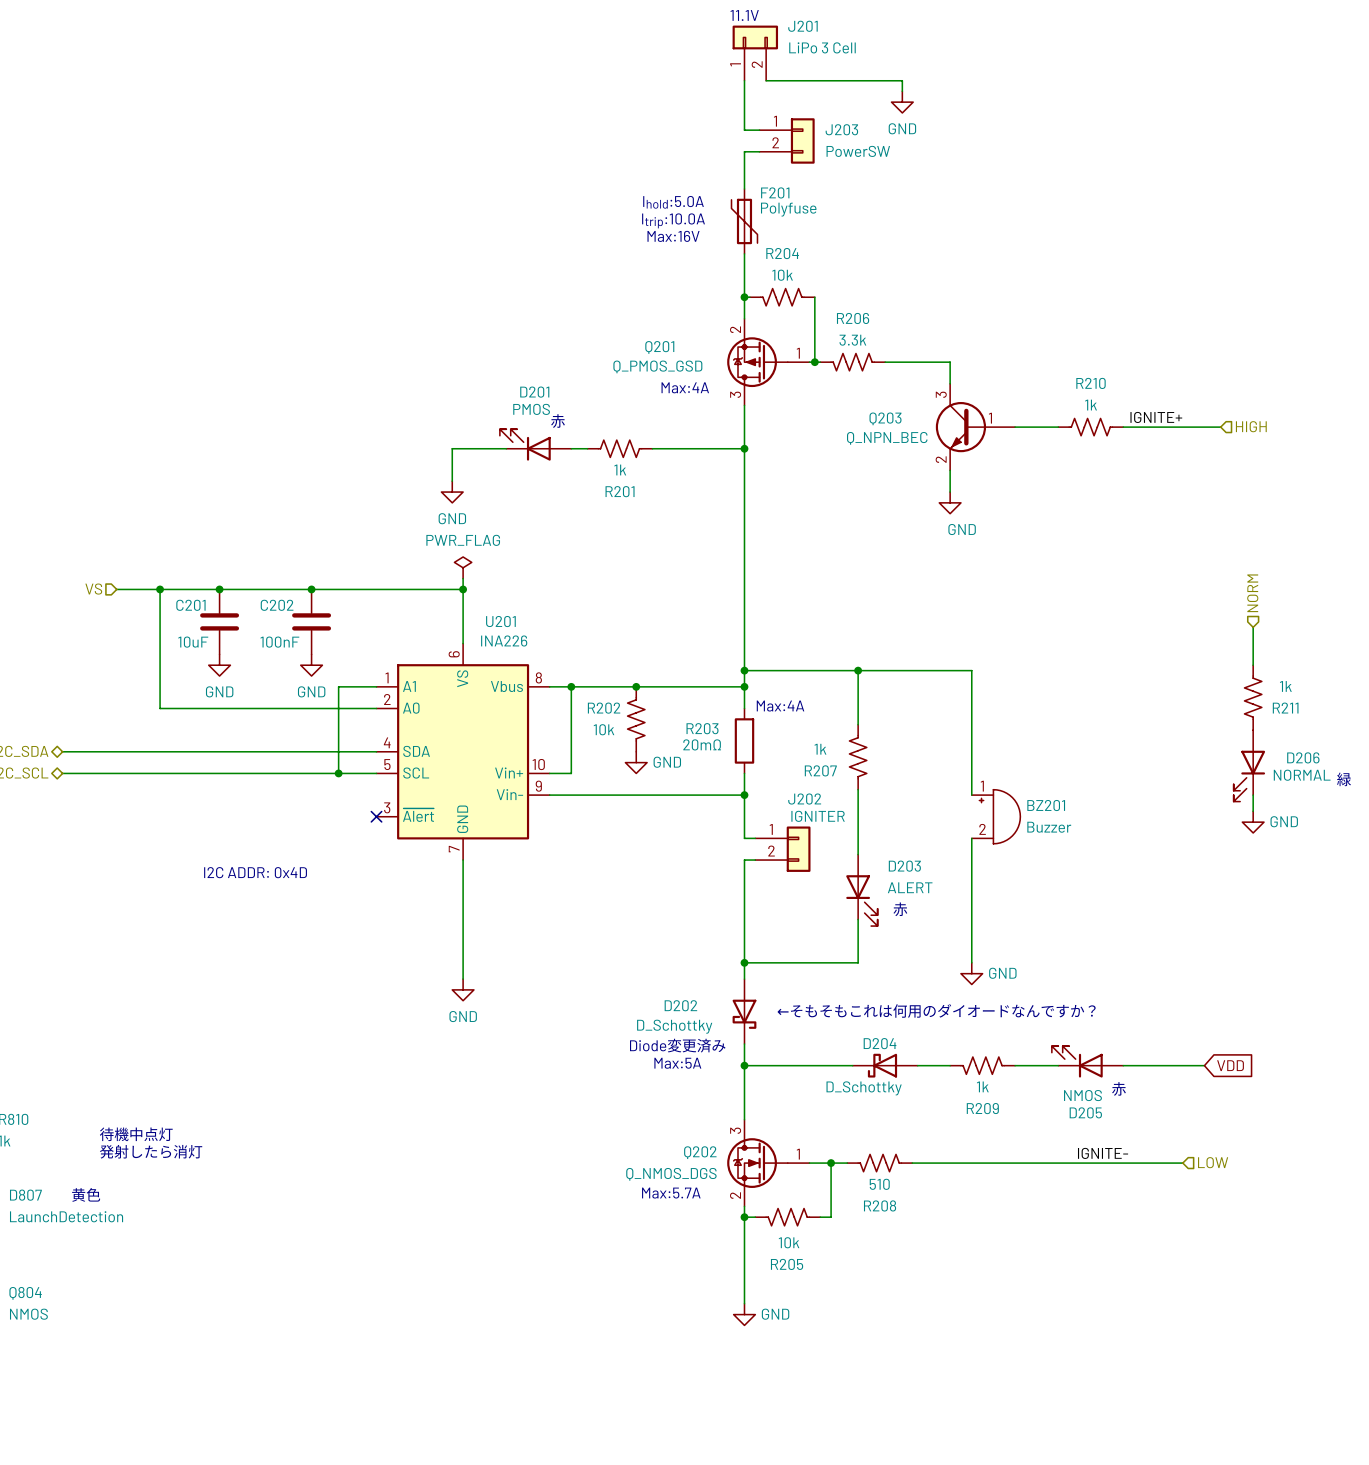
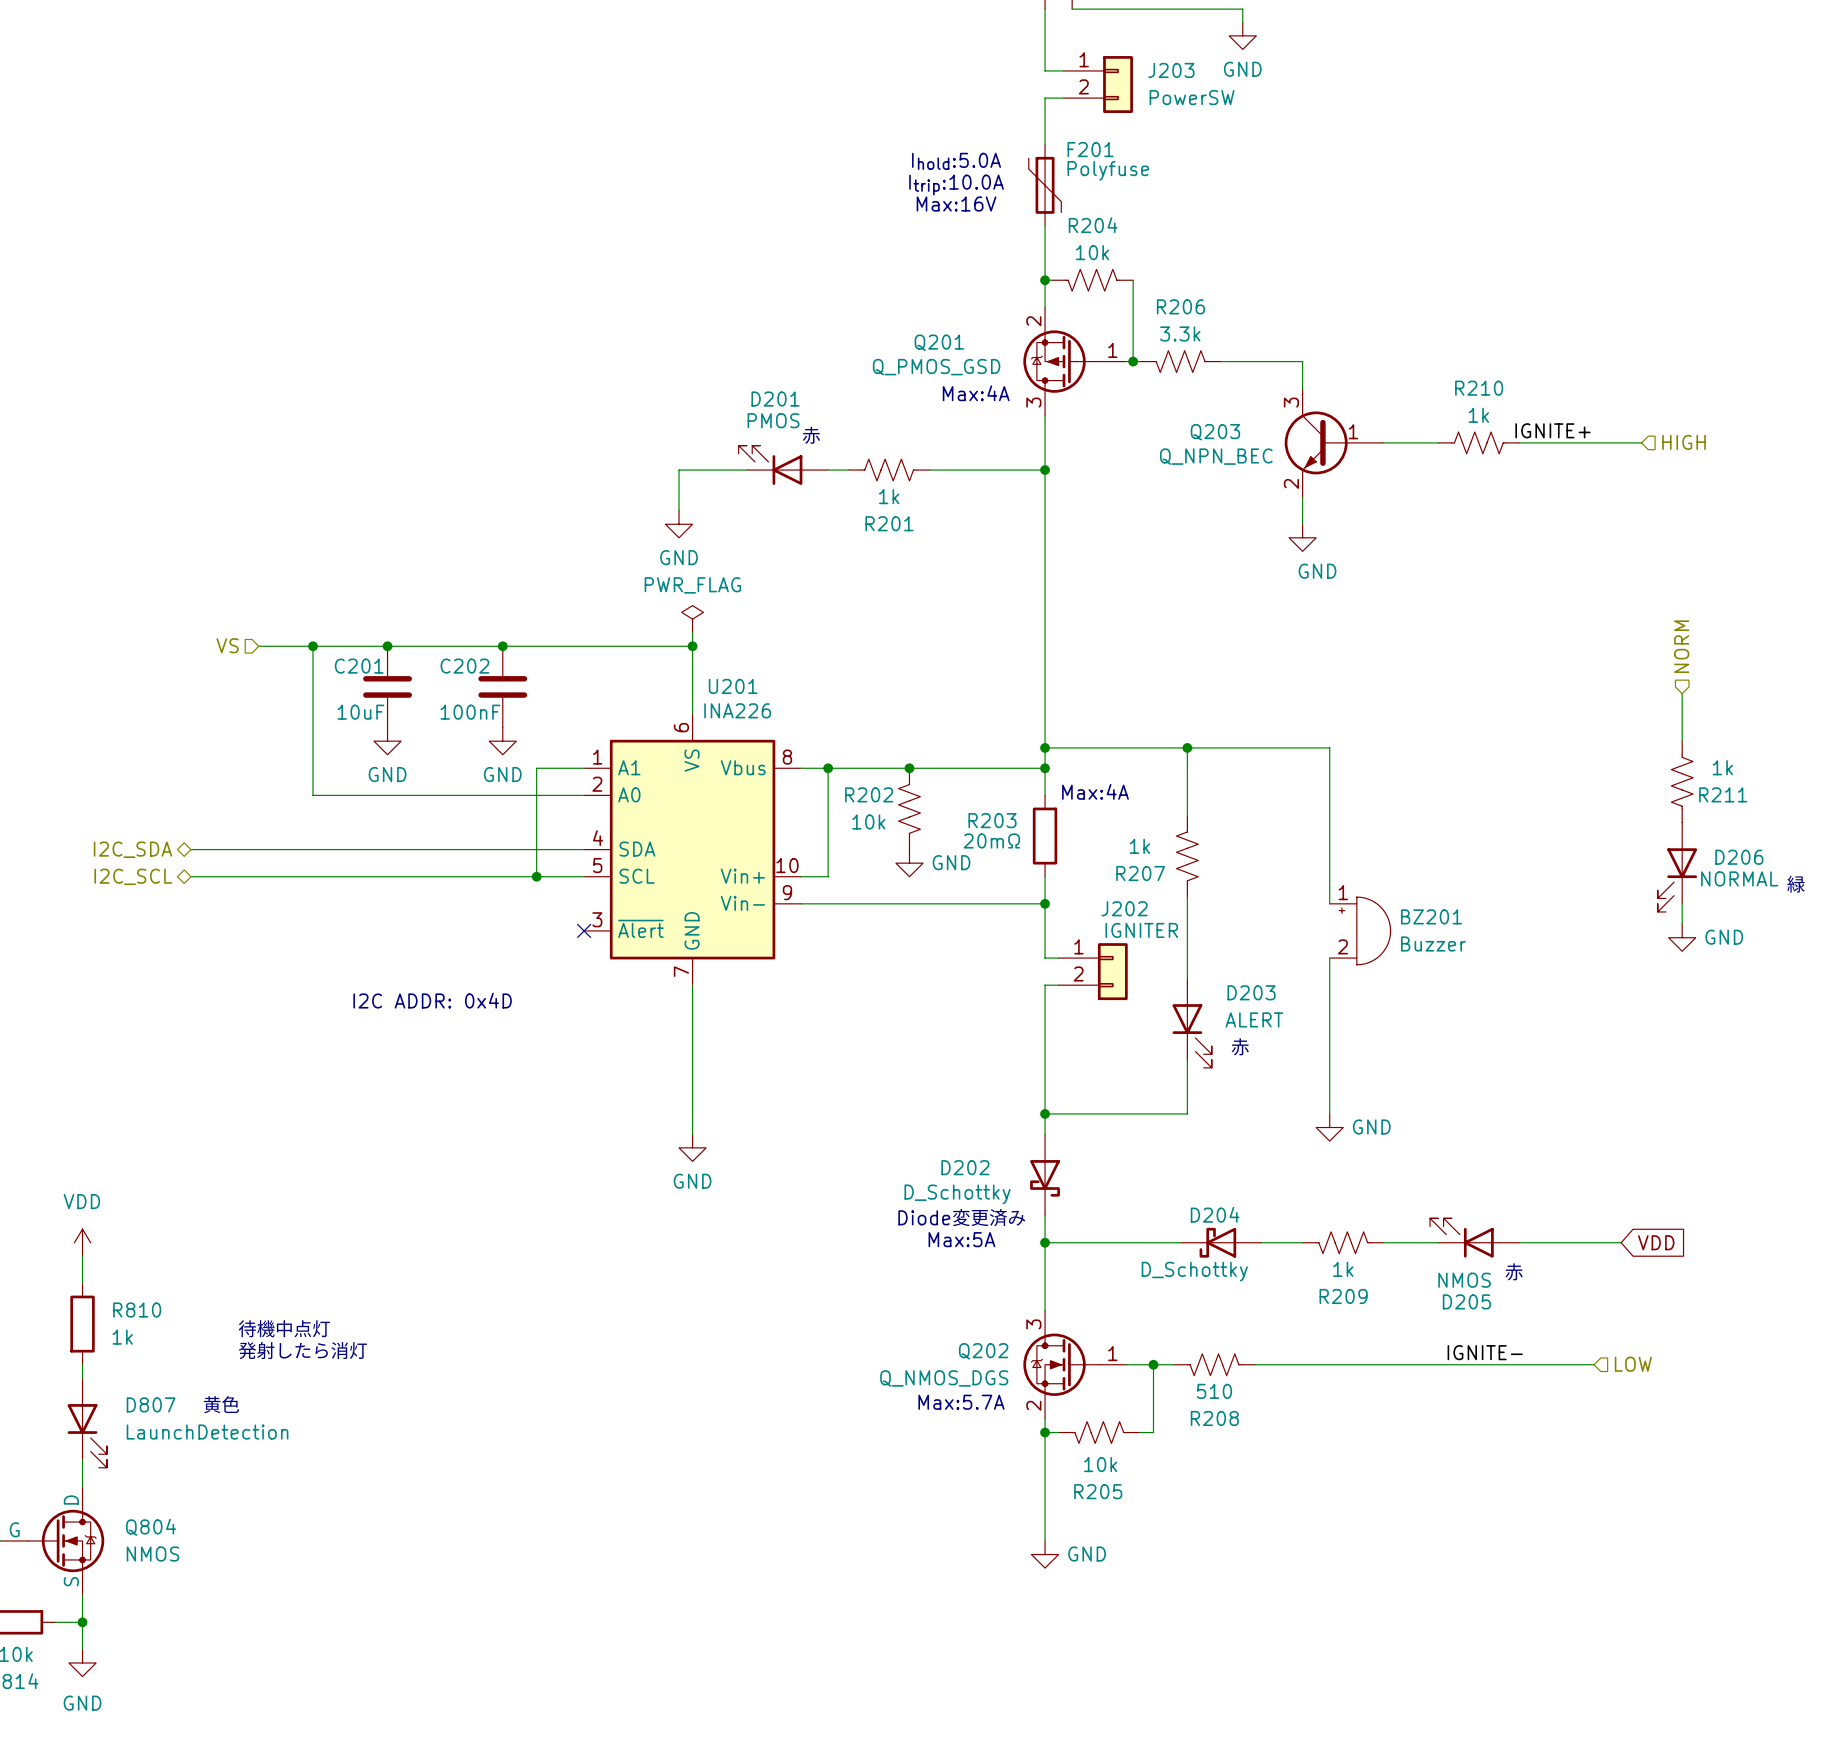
text: ←そもそもこれは何用のダイオードなんですか？ (936, 1010) -> none

